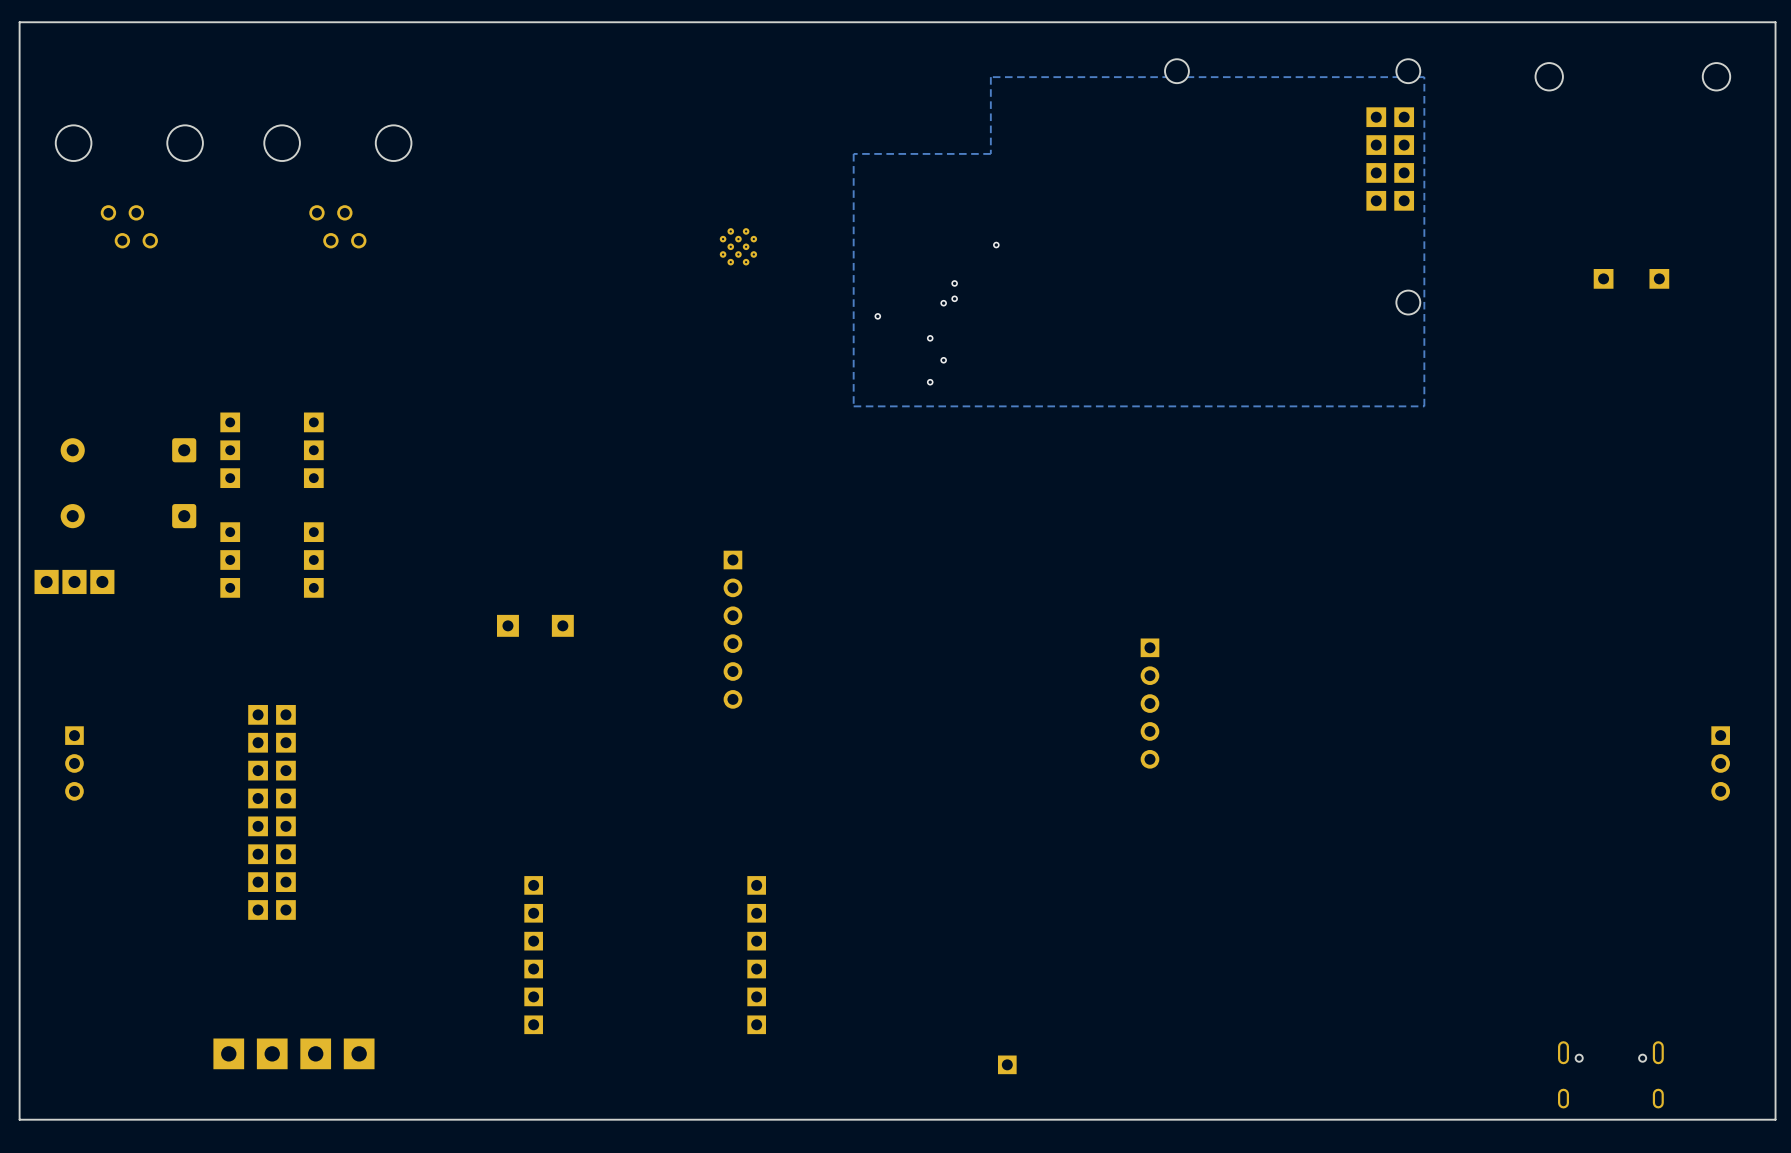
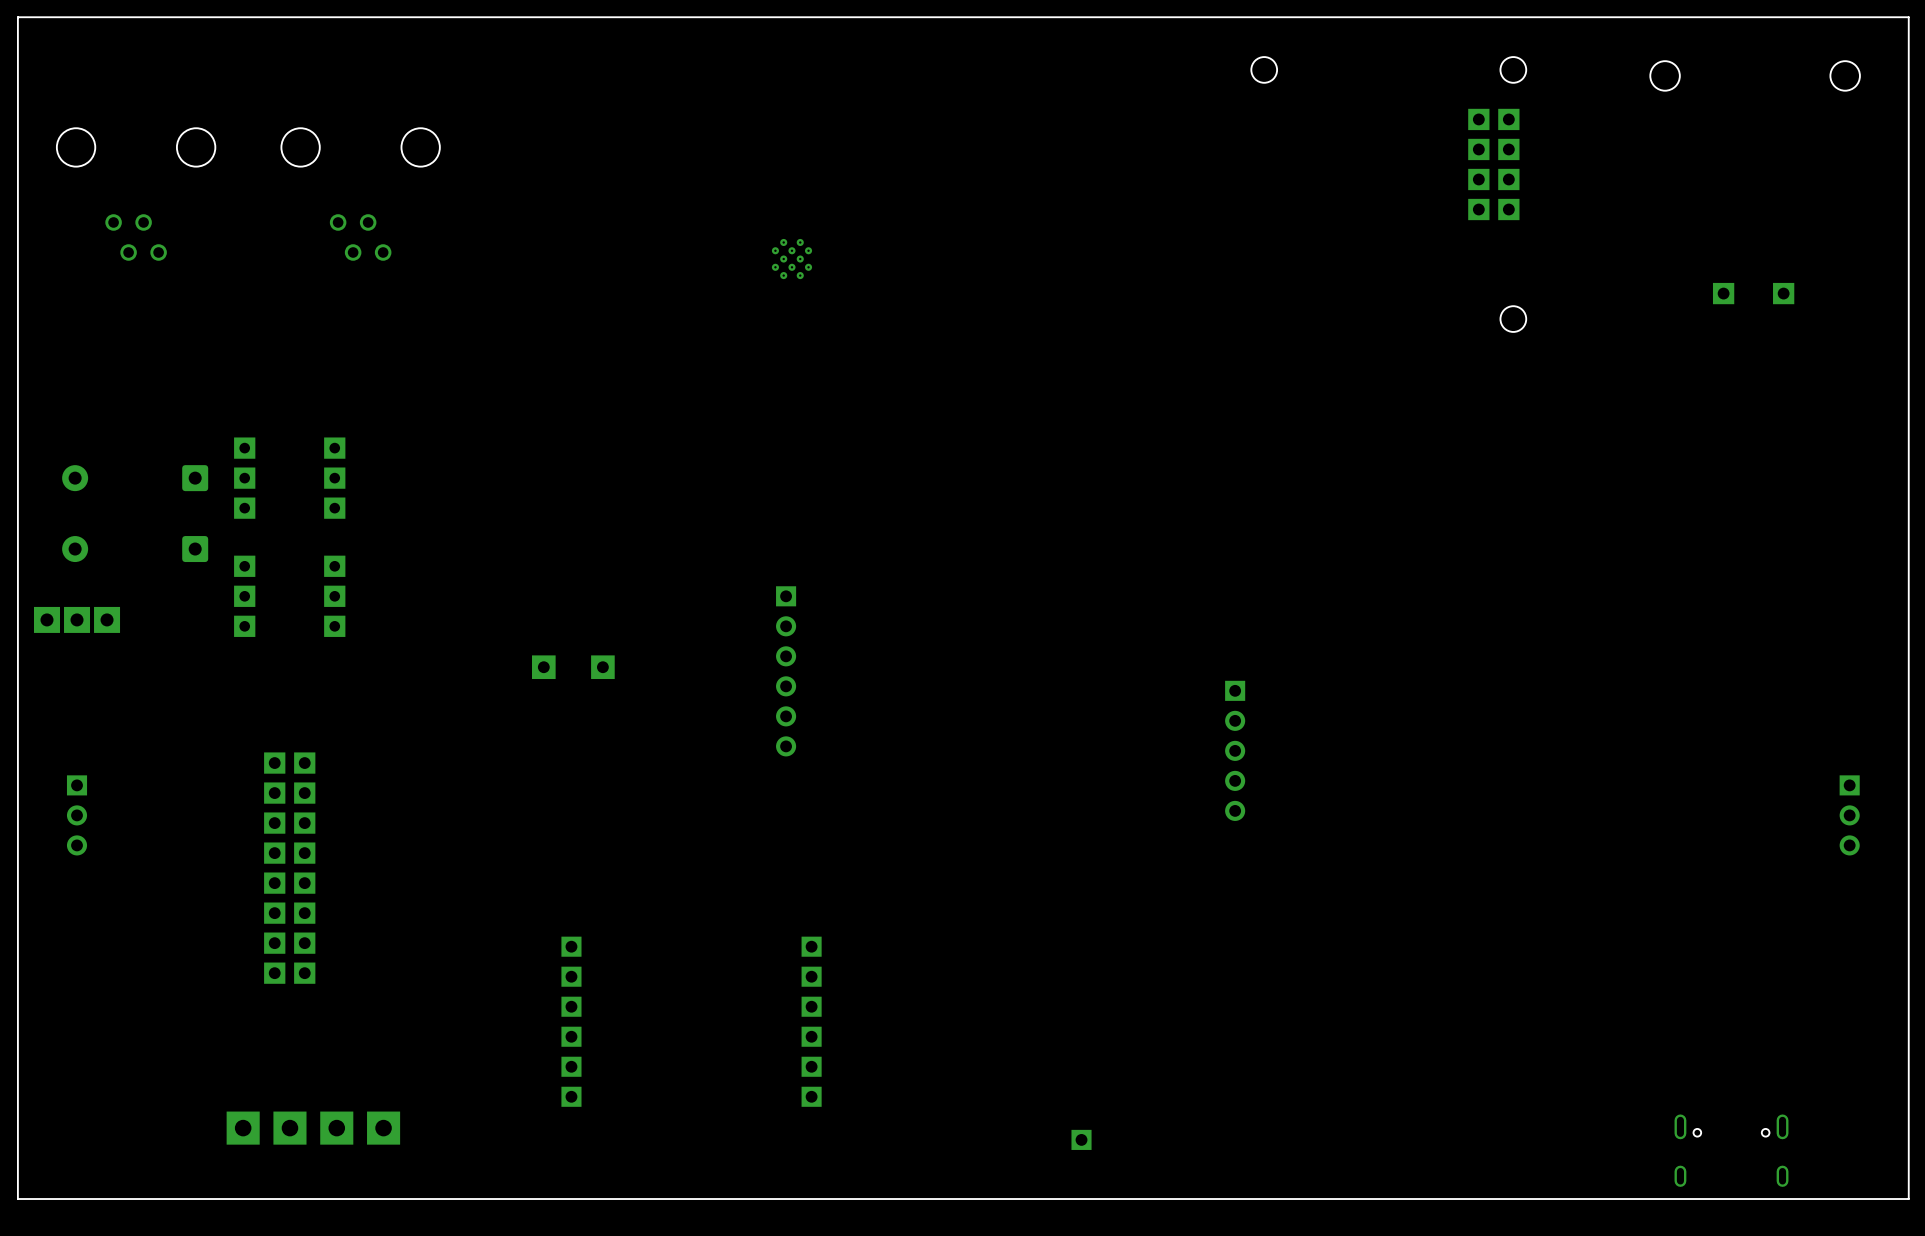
zone outline: (1424, 77) (990, 77) (990, 153) (853, 153) (853, 406) (1424, 406) (1424, 77) -> none
via: (996, 245) -> none
via: (954, 283) -> none
via: (954, 298) -> none
via: (943, 303) -> none
via: (877, 316) -> none
via: (930, 338) -> none
via: (943, 360) -> none
via: (930, 382) -> none

